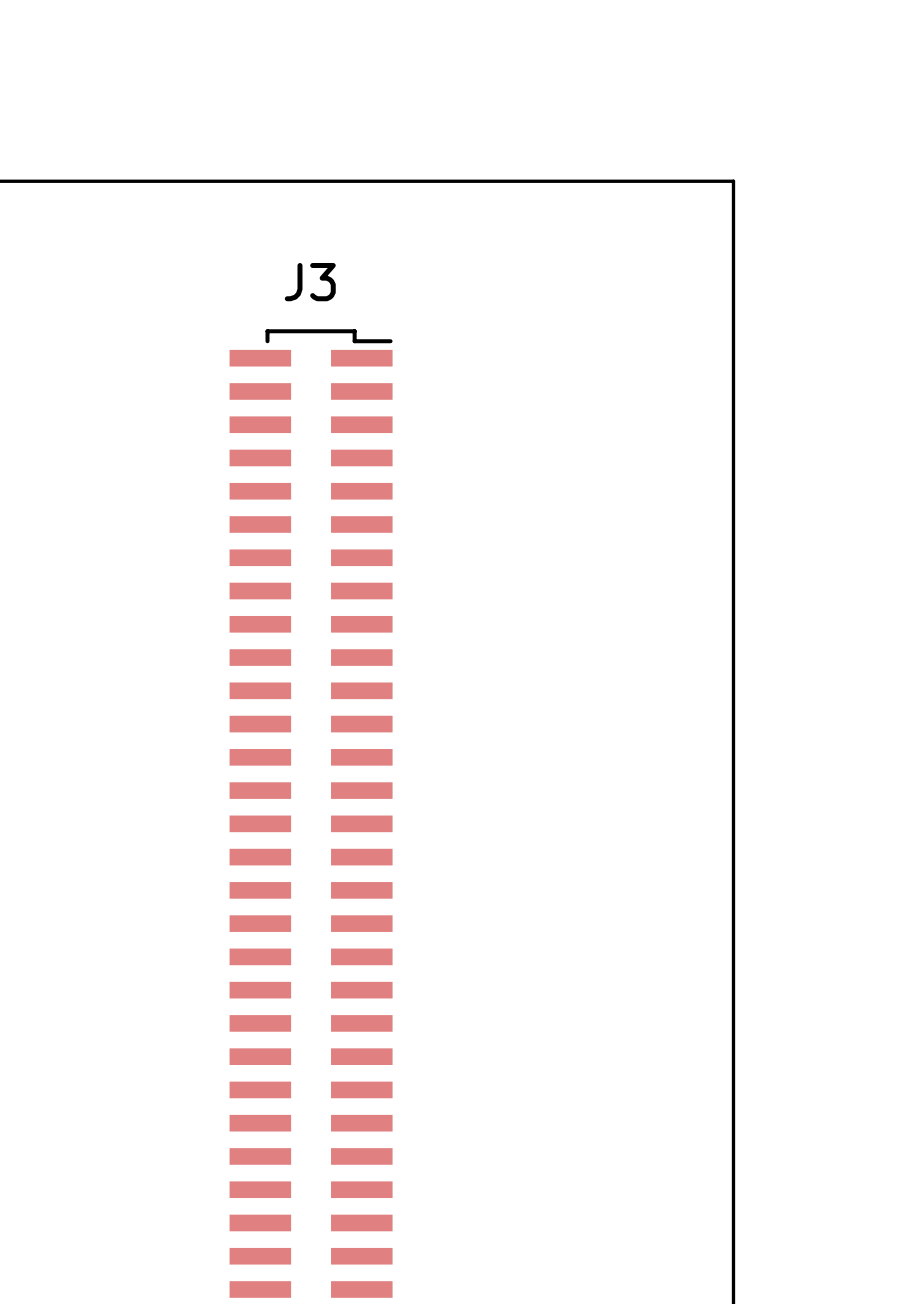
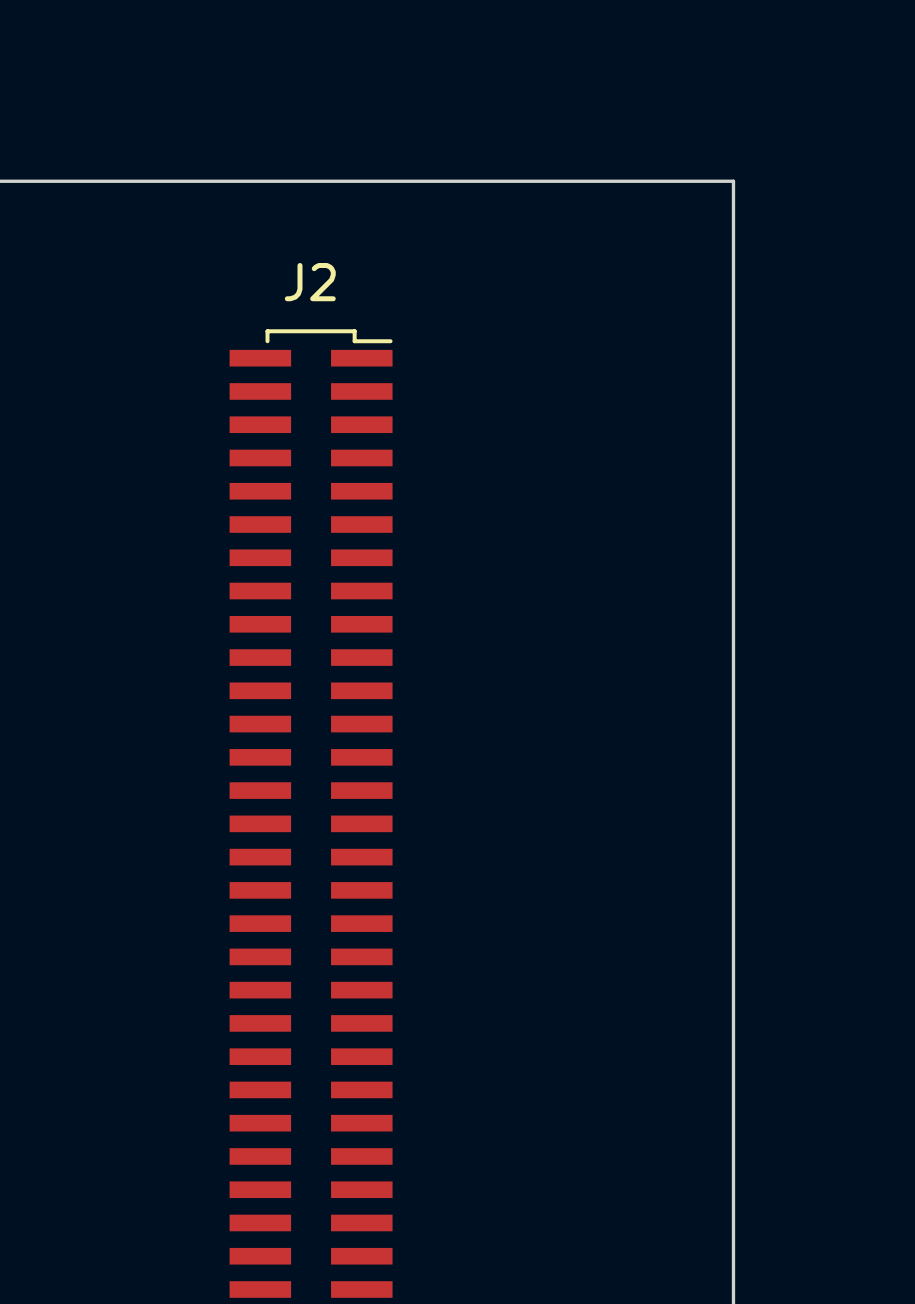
J3 name: J3 (310, 282) -> J2 (310, 282)

